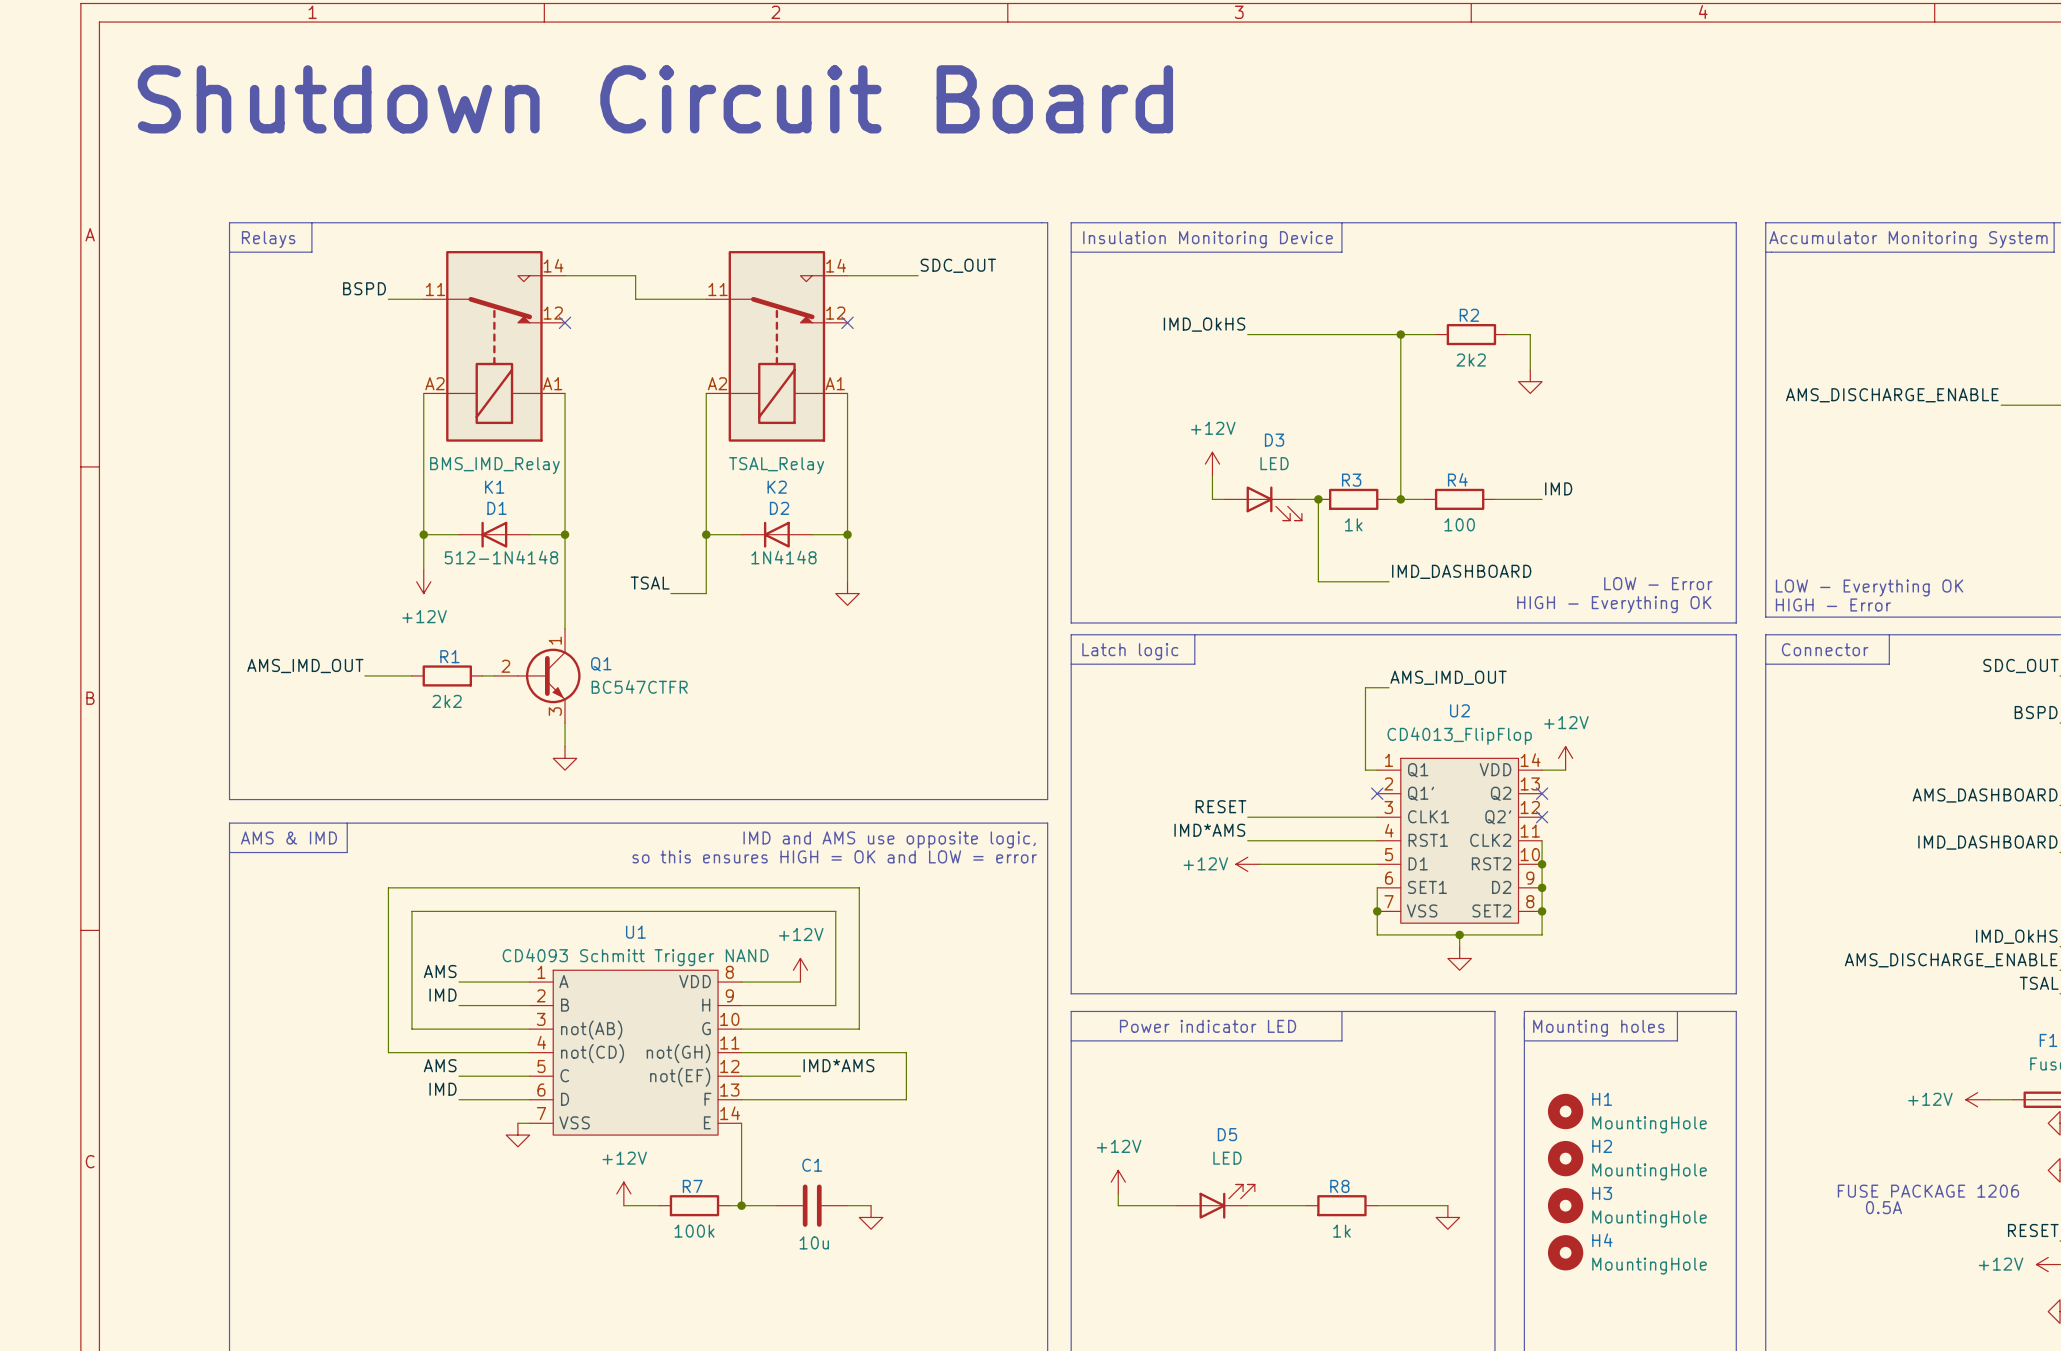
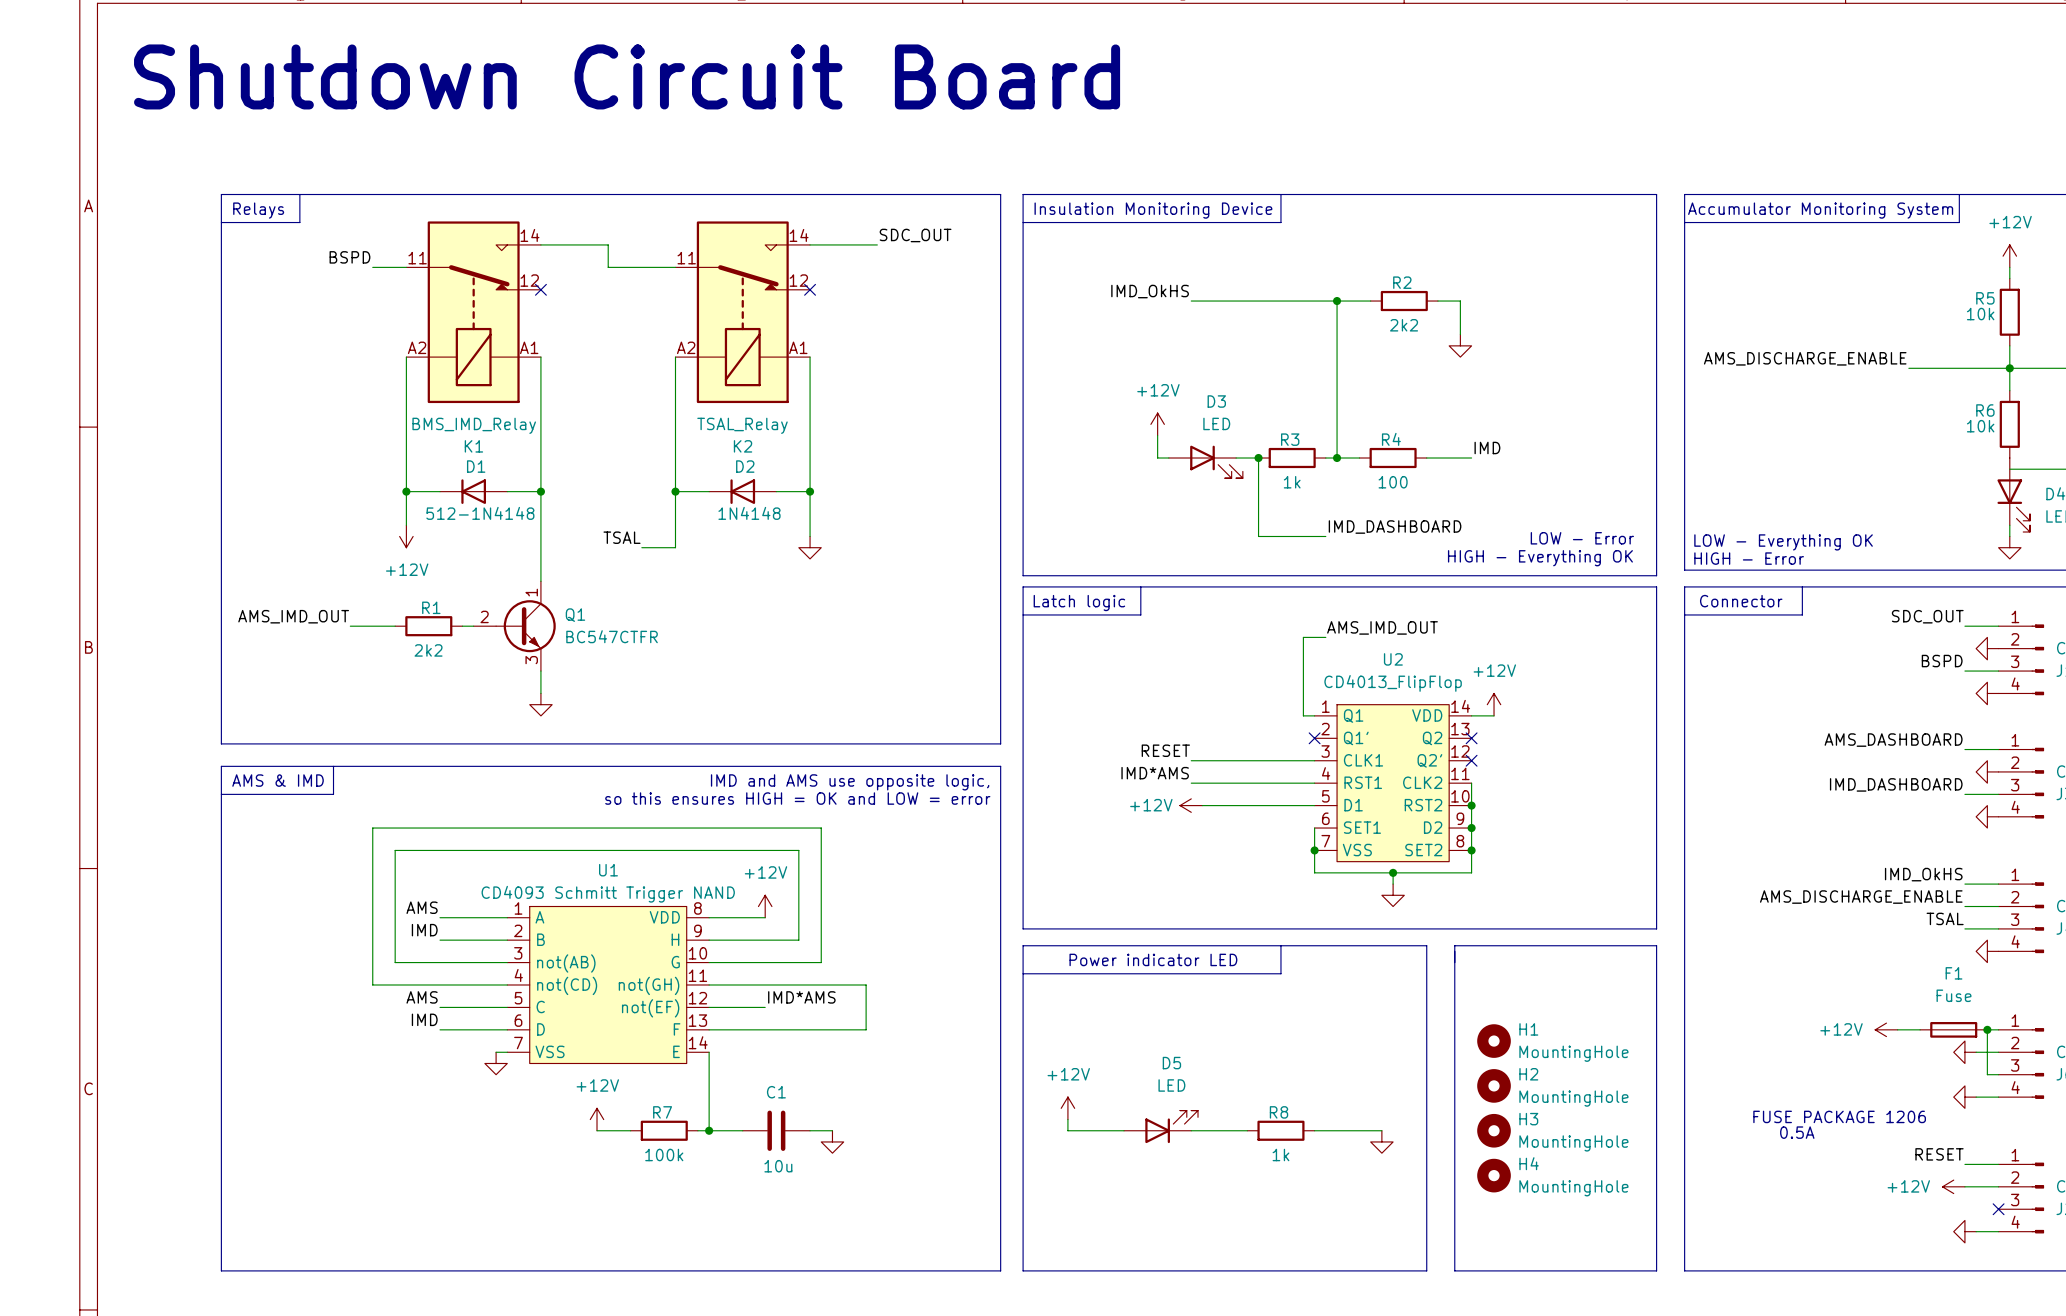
line: (1677, 1011) (1677, 1040) (1524, 1040) -> none
text: Mounting holes (1598, 1028) -> none

